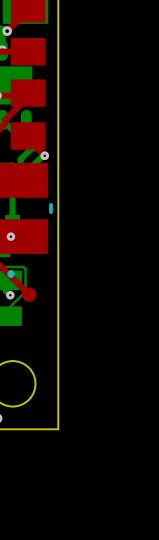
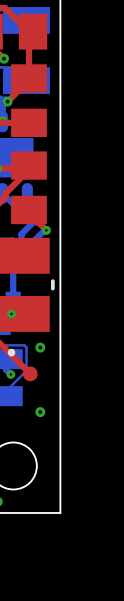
via: none -> (40, 347)
via: none -> (40, 412)

